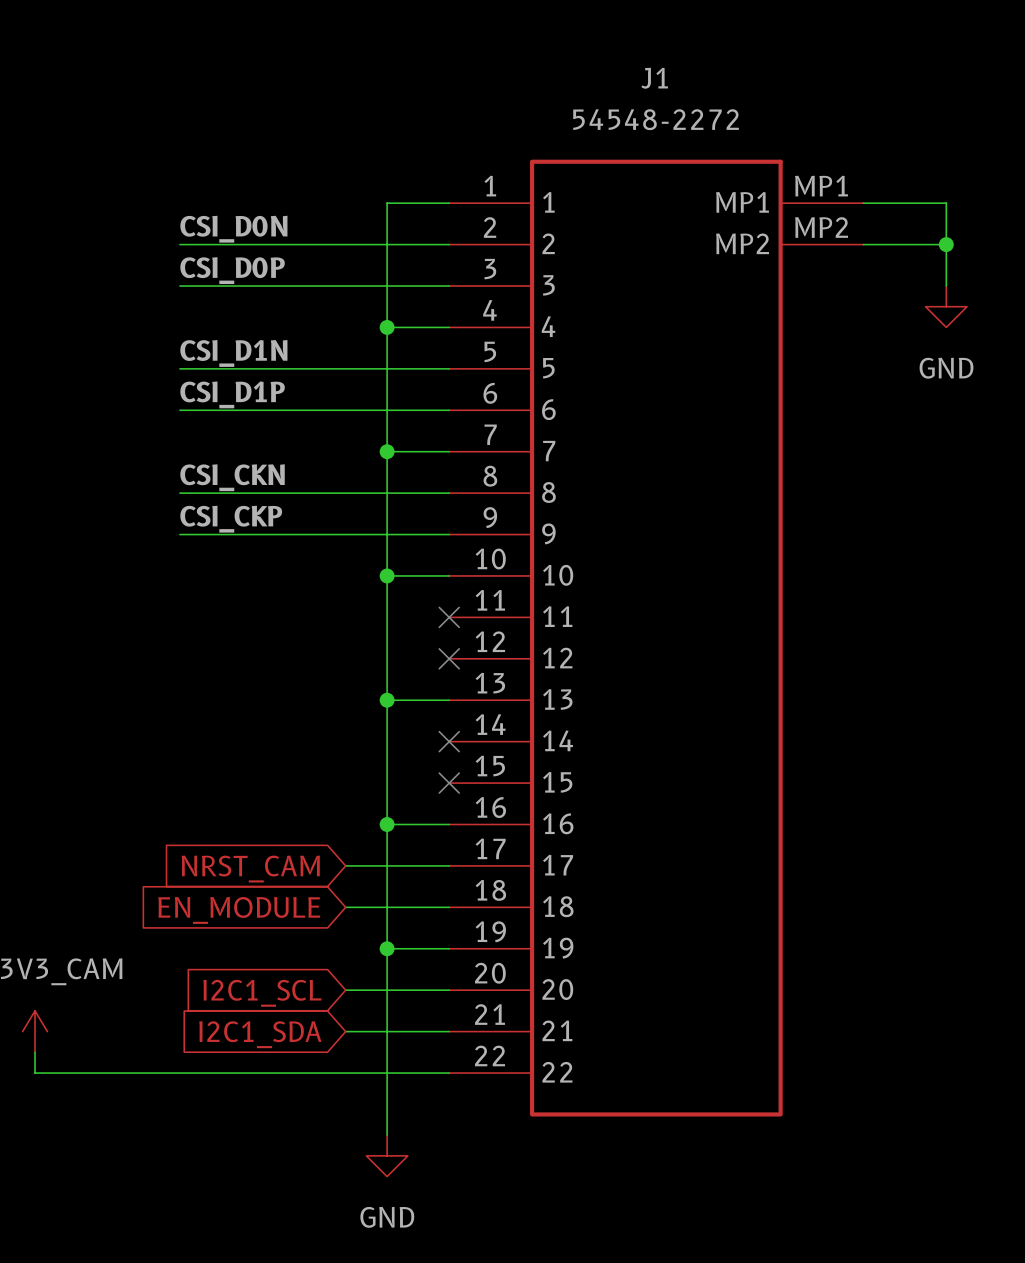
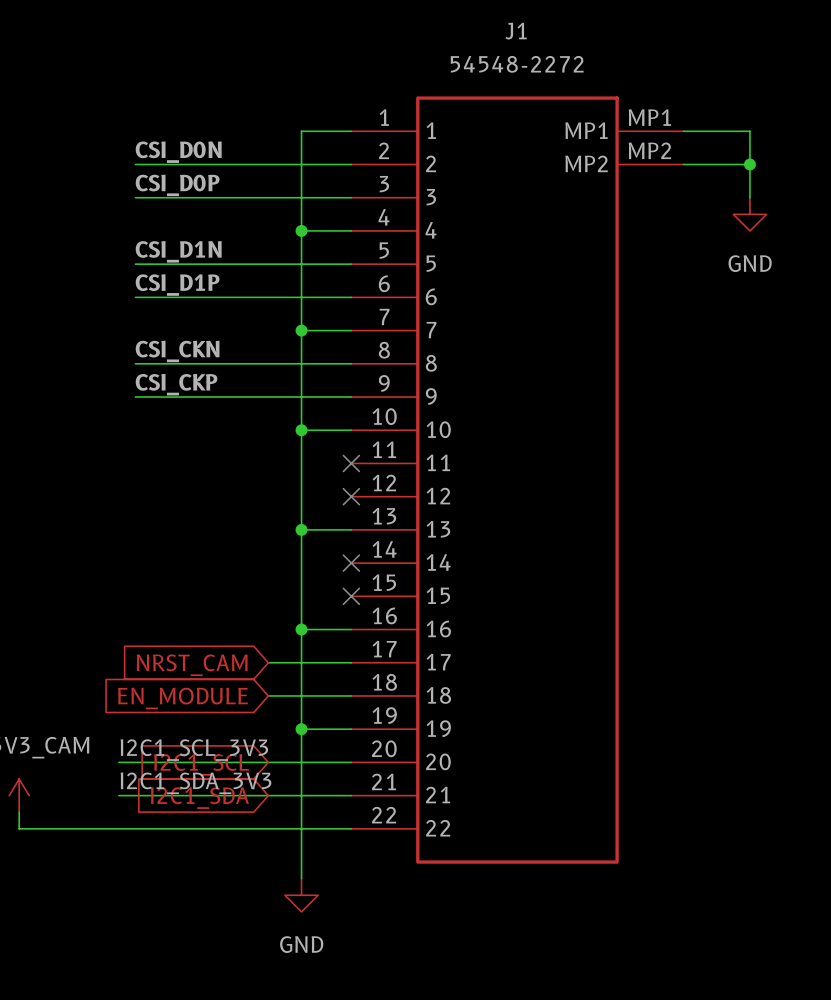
label: none -> I2C1_SCL_3V3 (194, 750)
wire: none -> (118, 762) (268, 762)
label: none -> I2C1_SDA_3V3 (195, 783)
wire: none -> (118, 795) (268, 795)

